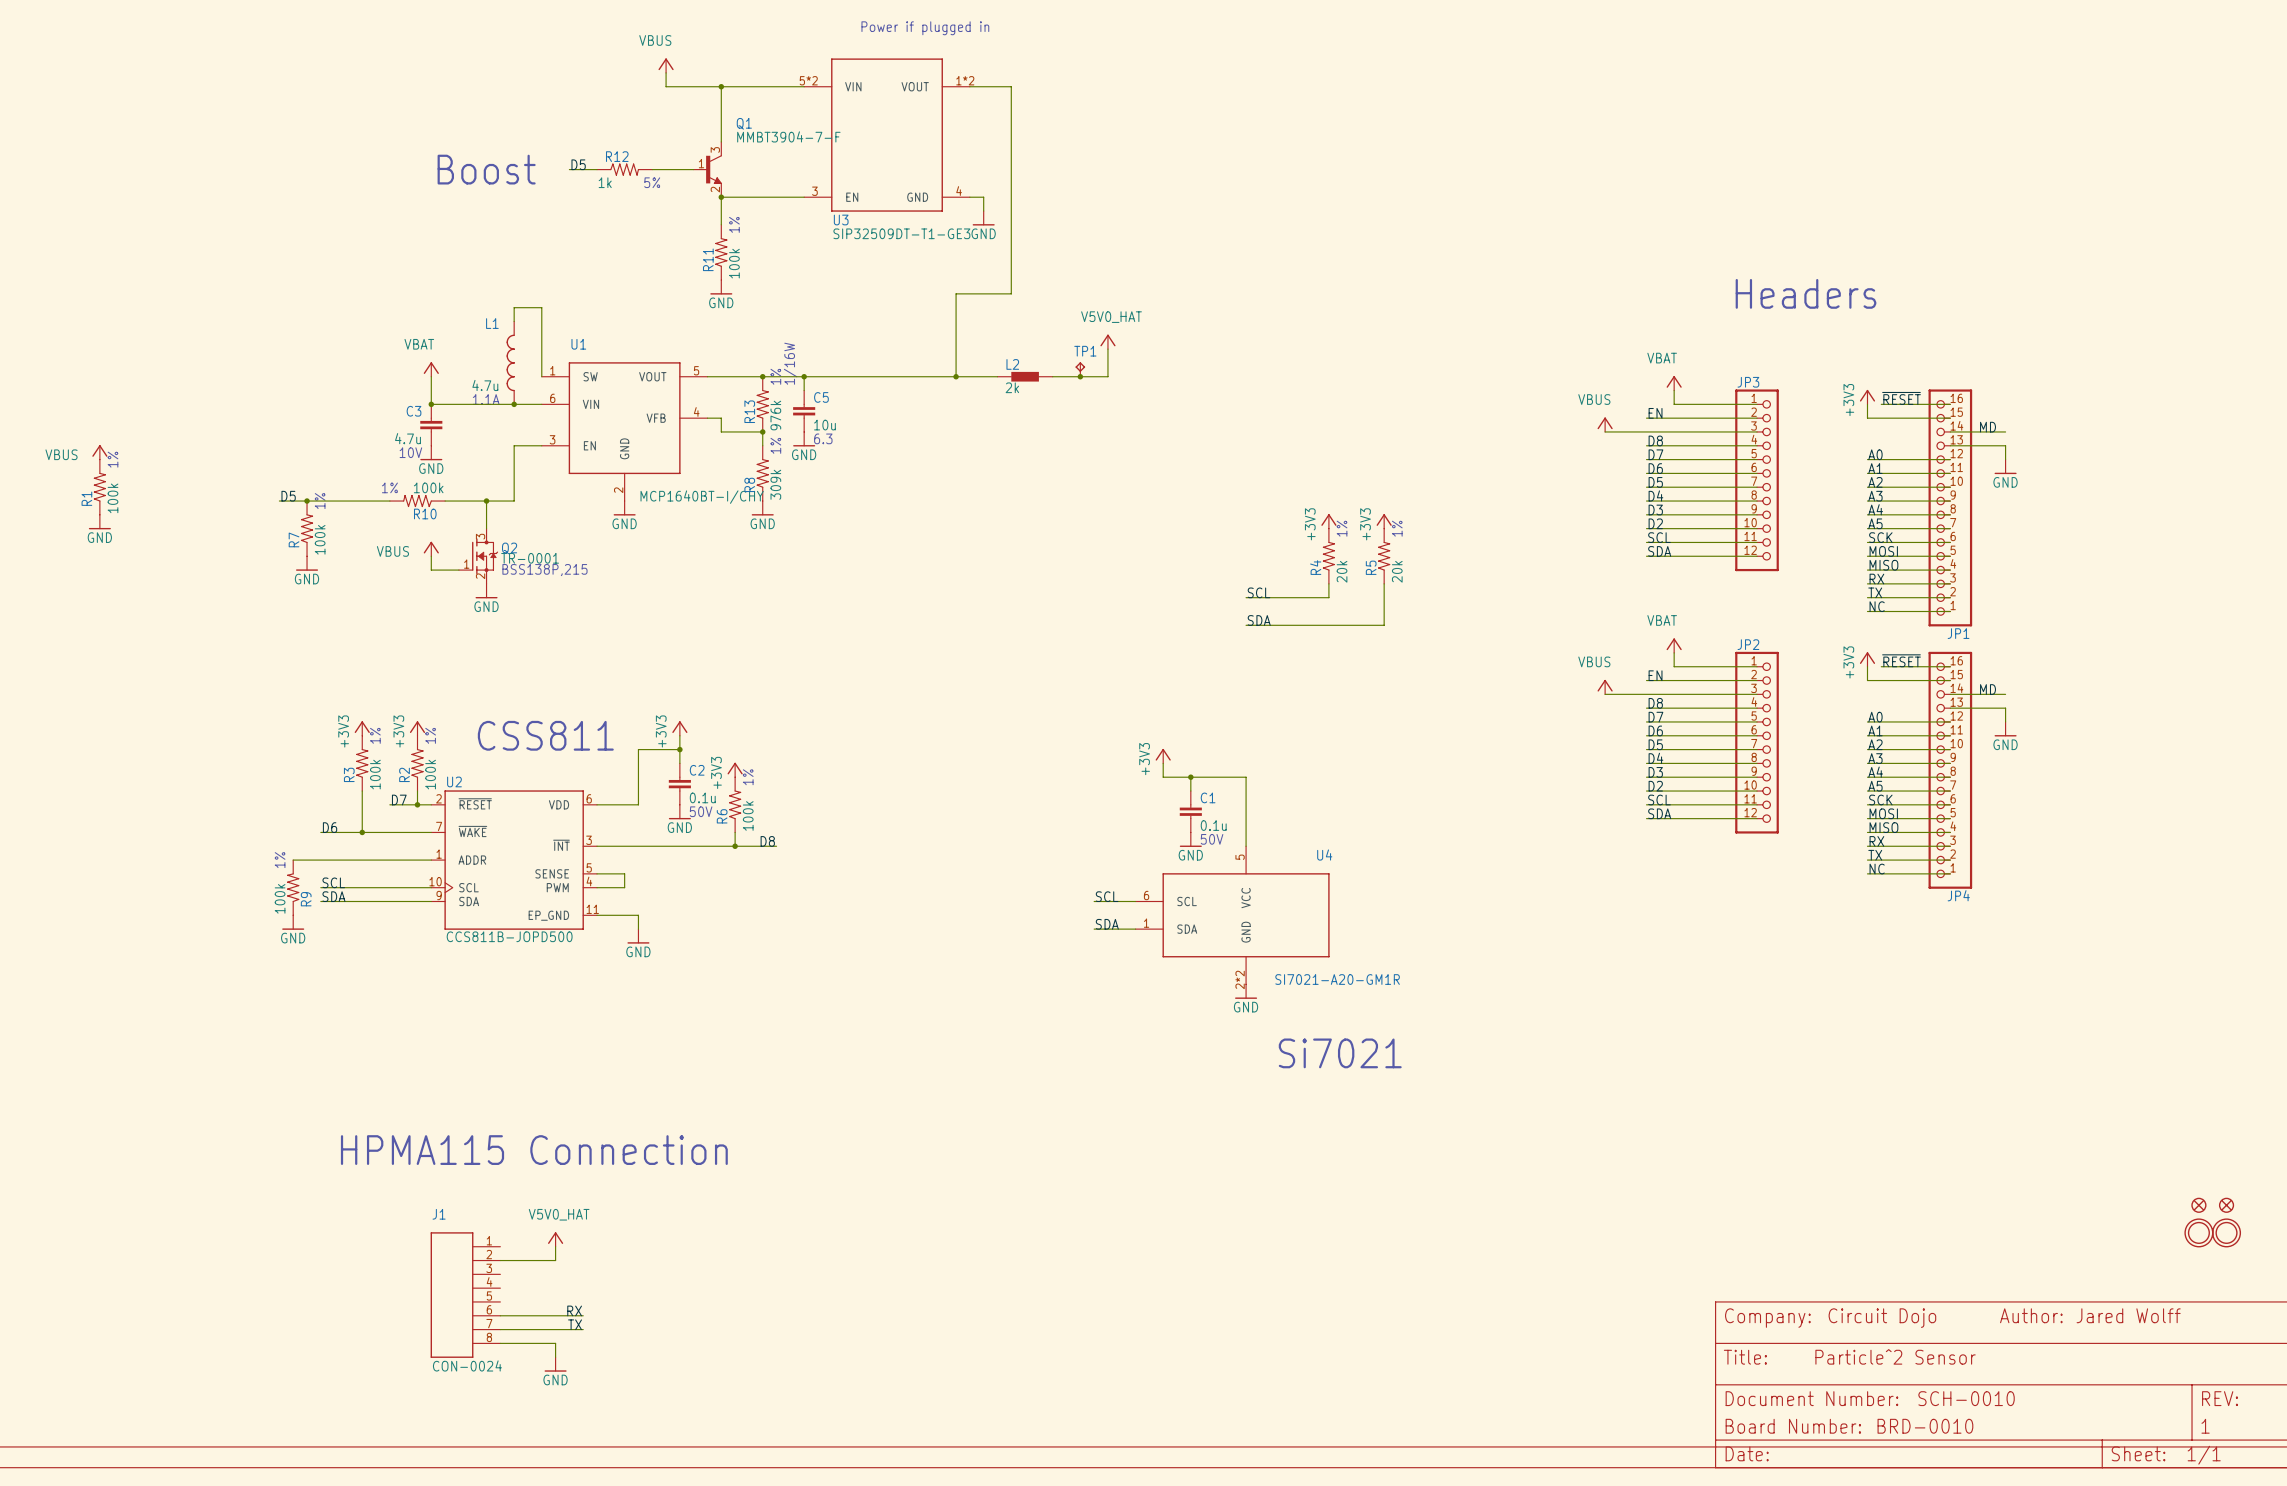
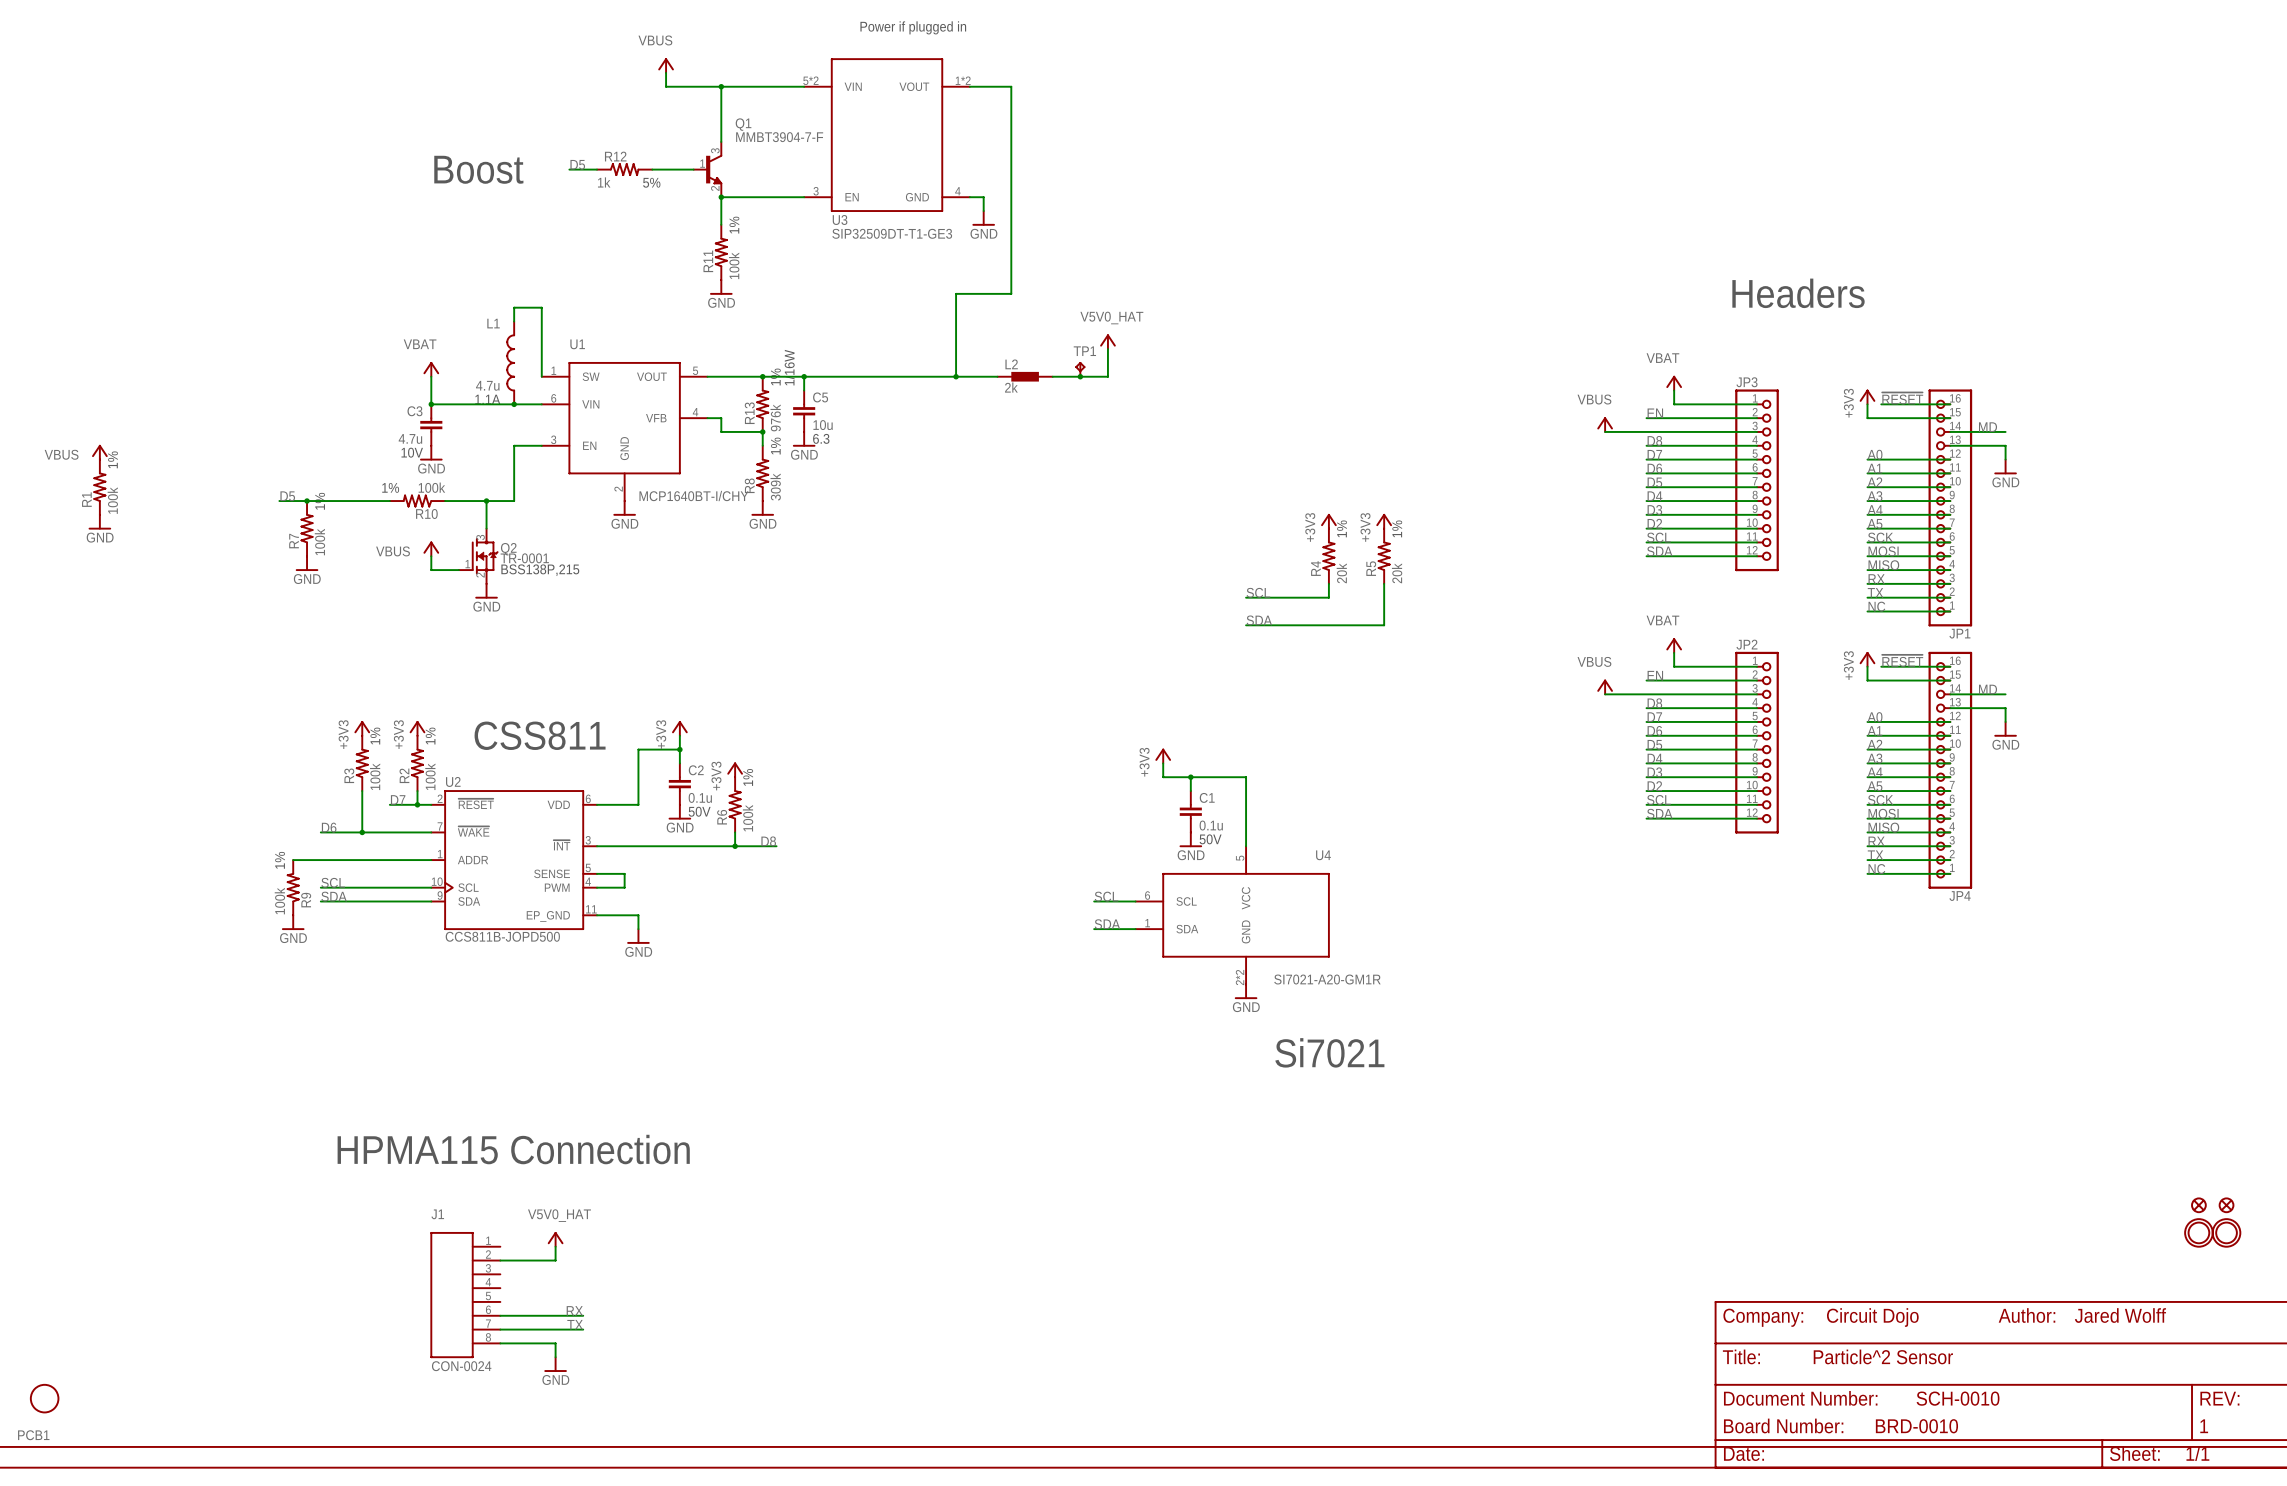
PCB1: none -> (44, 1398)

